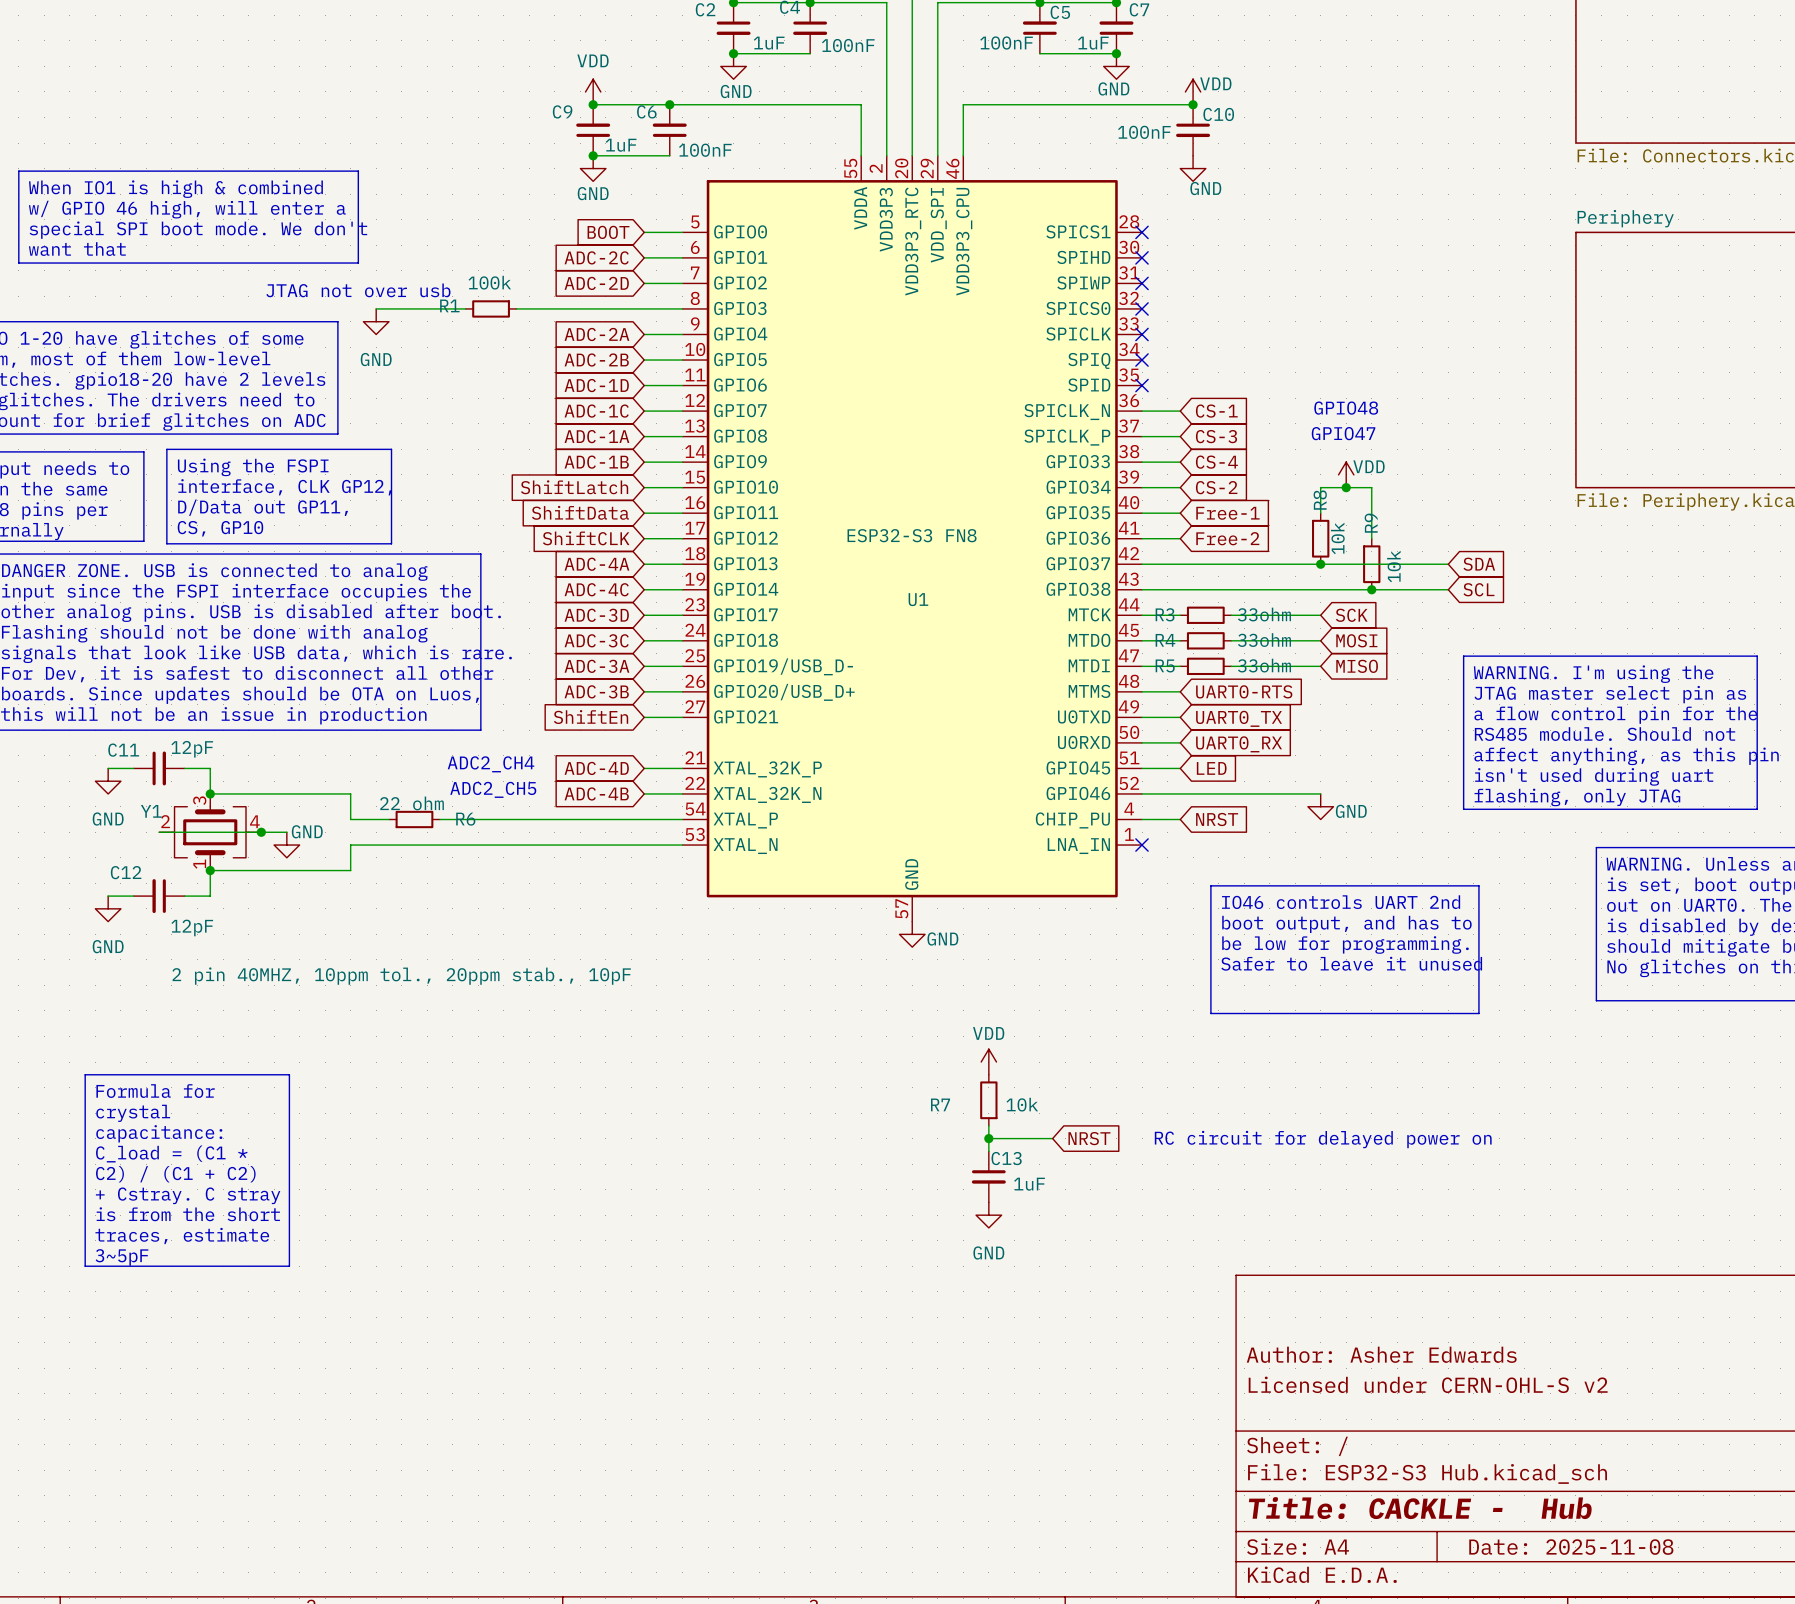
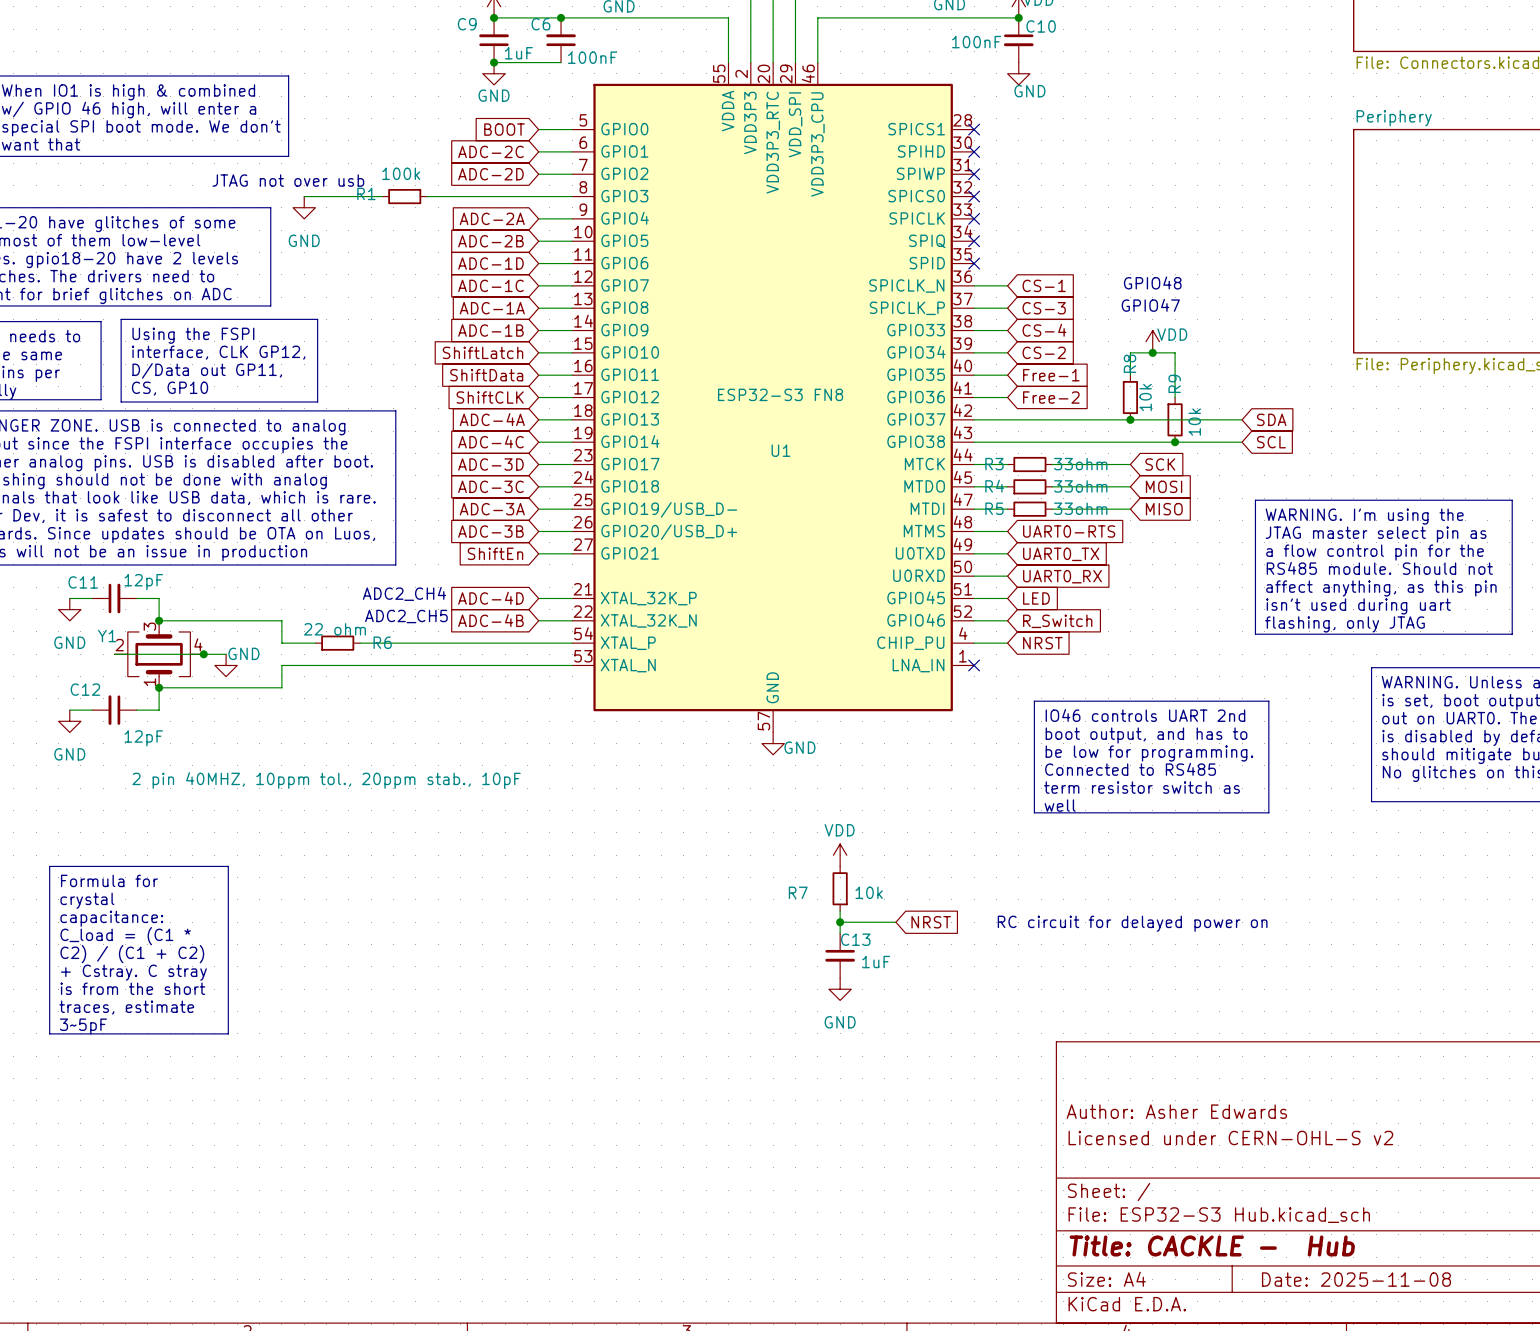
wire: (1180, 793) (1320, 793) -> none
global label: none -> R_Switch (1057, 621)
power symbol: GND (1320, 806) -> none
text: Safer to leave it unused (1351, 963) -> Connected to RS485 (1130, 769)
text: none -> term resistor switch as (1142, 787)
text: none -> well (1060, 805)

